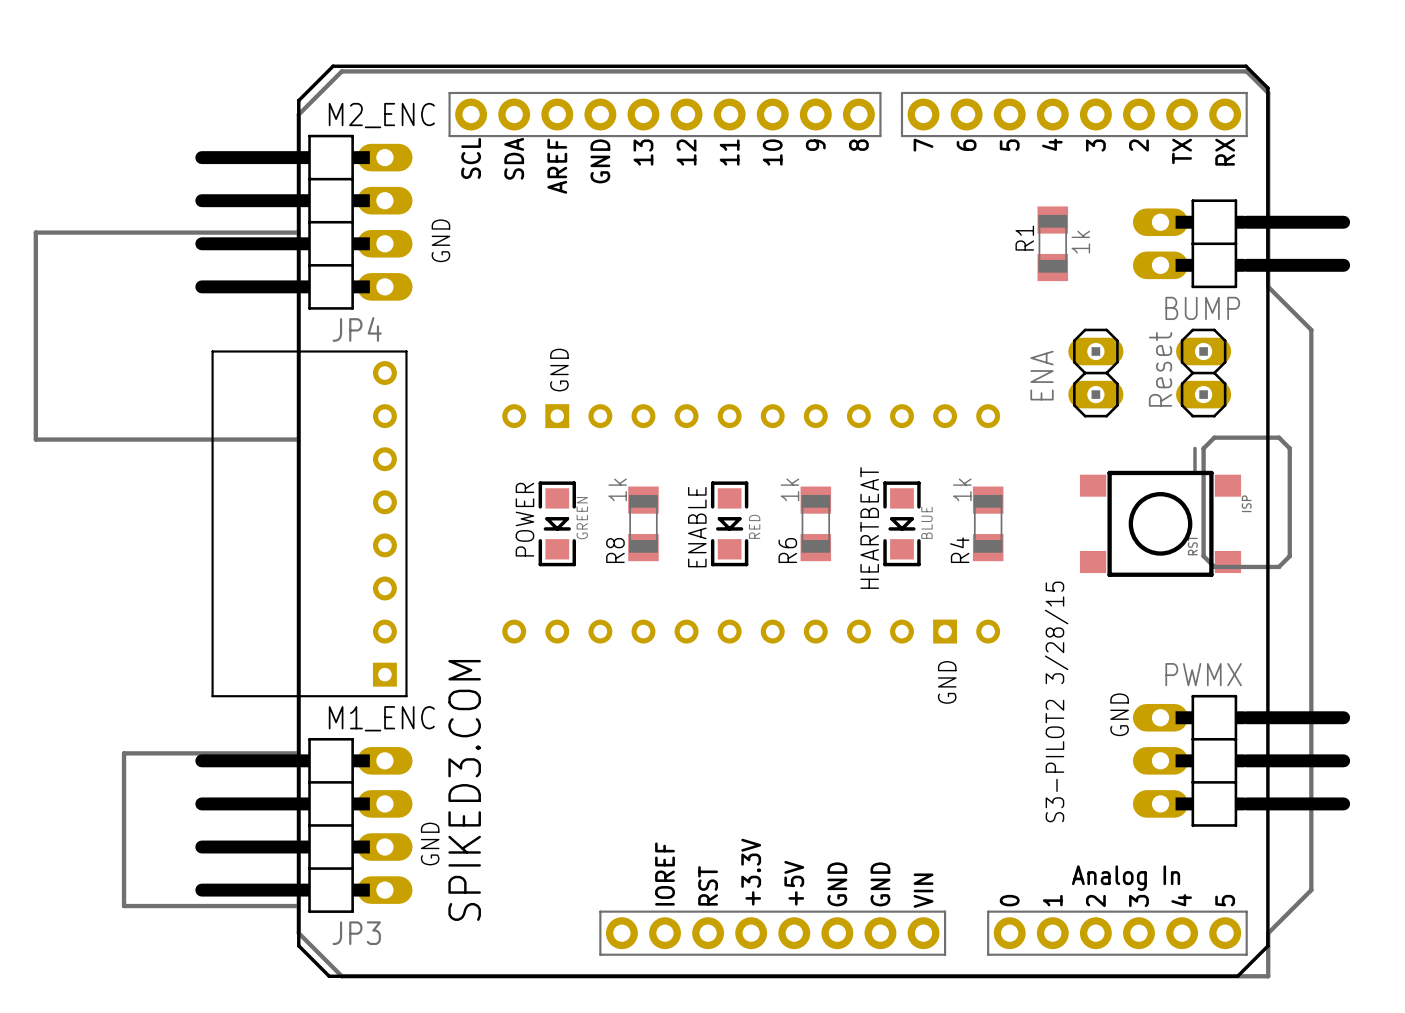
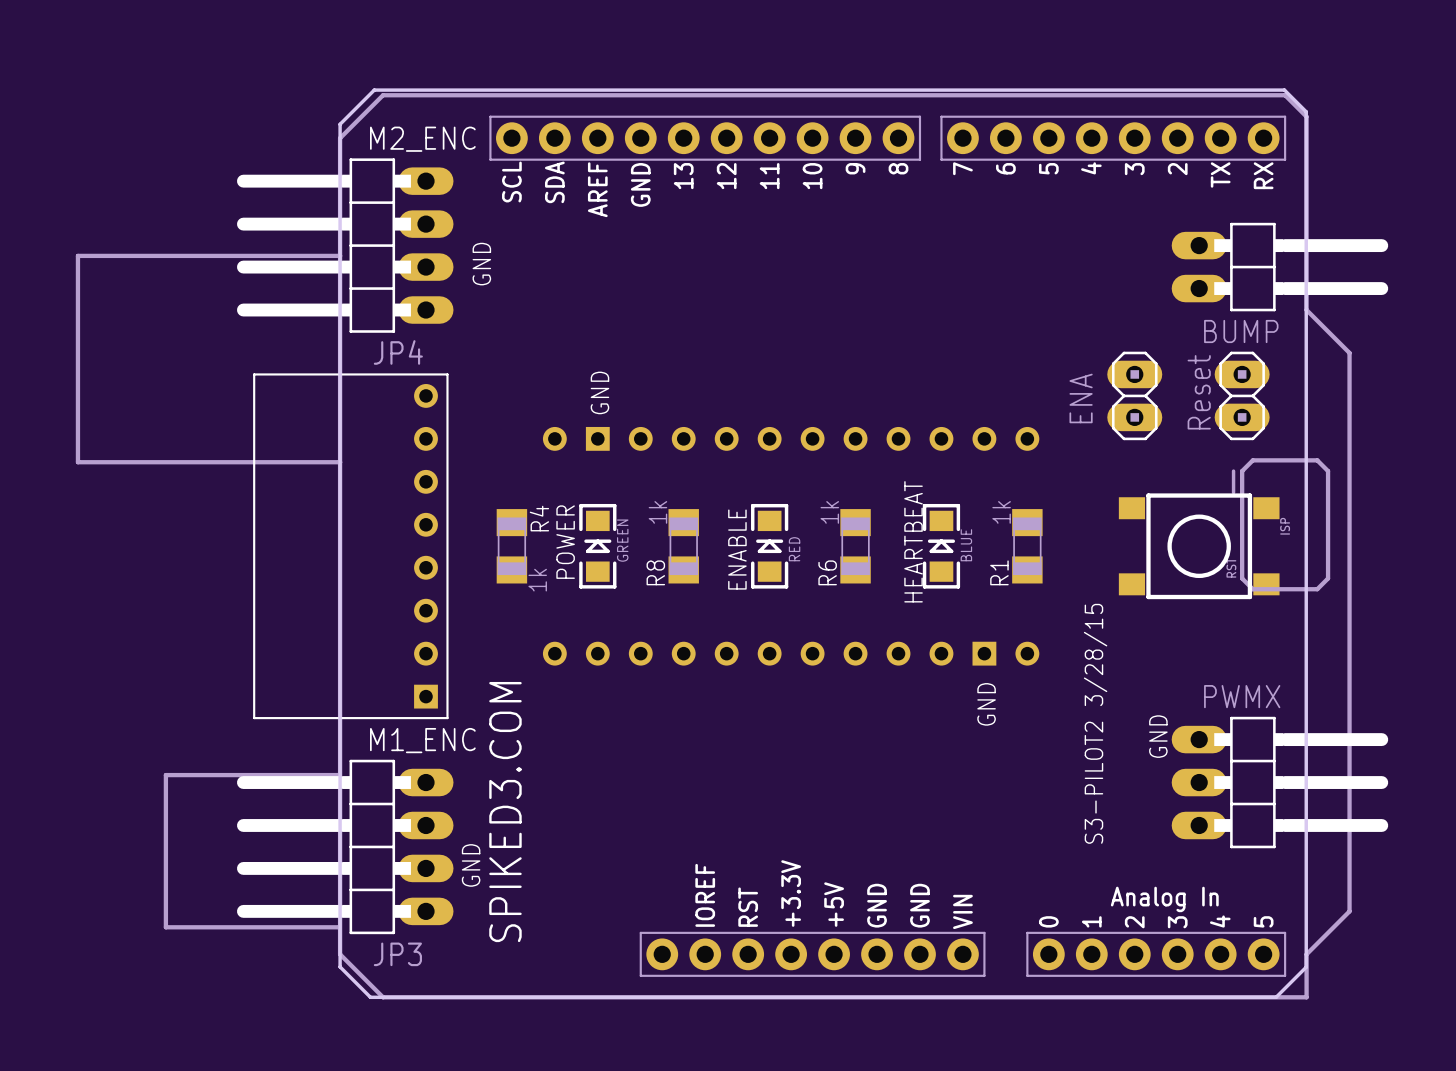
R1: 1k (1052, 243) -> none
R4: none -> 1k (511, 546)
POWER rotation: 0° (557, 523) -> 180° (597, 546)
ENABLE rotation: 0° (729, 523) -> 180° (769, 546)
HEARTBEAT rotation: 0° (901, 523) -> 180° (941, 546)
R4 name: R4 (959, 550) -> R1 (999, 572)

